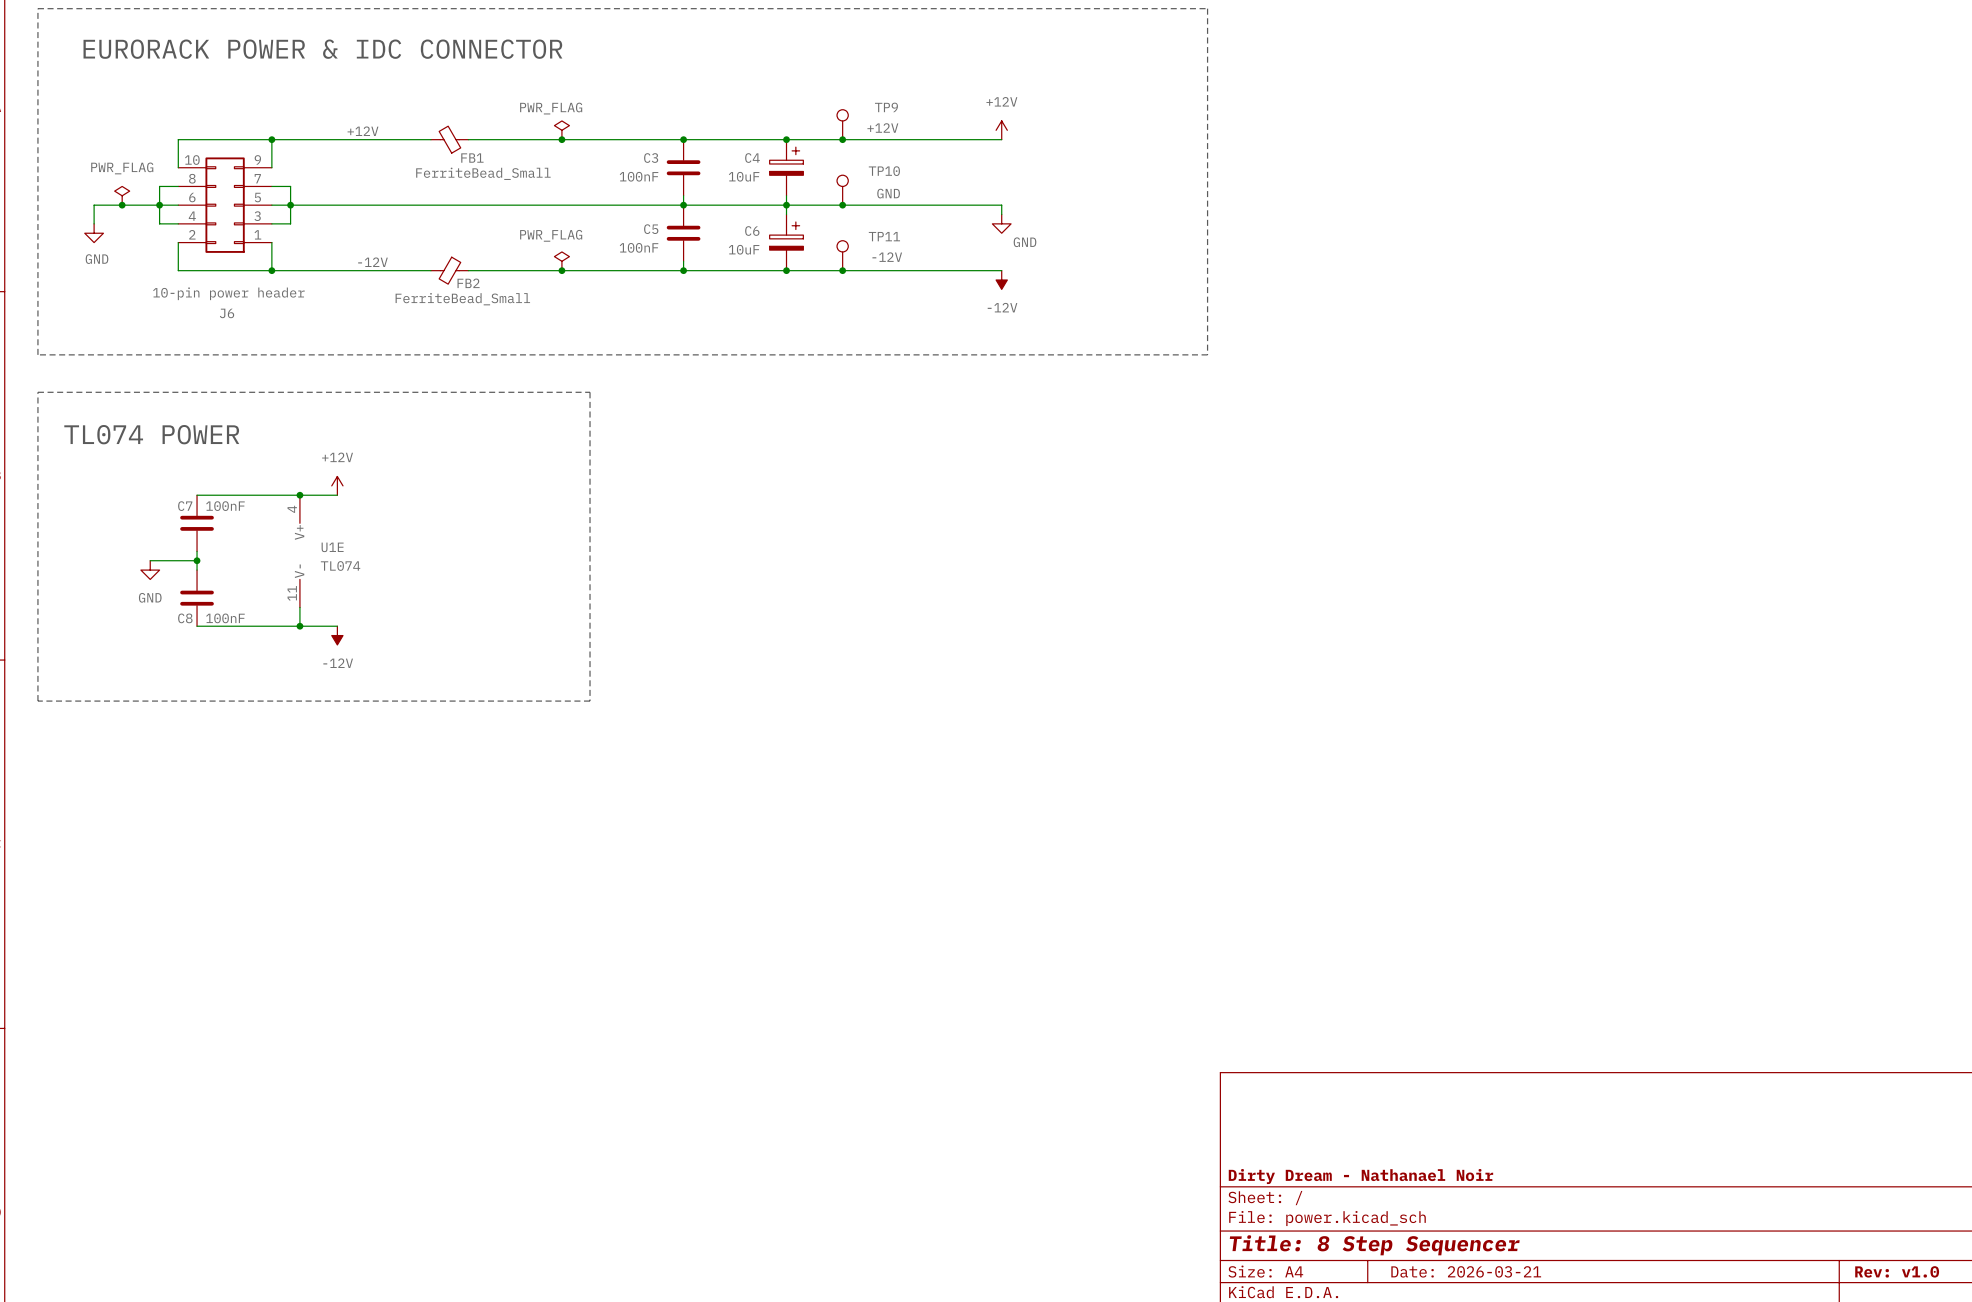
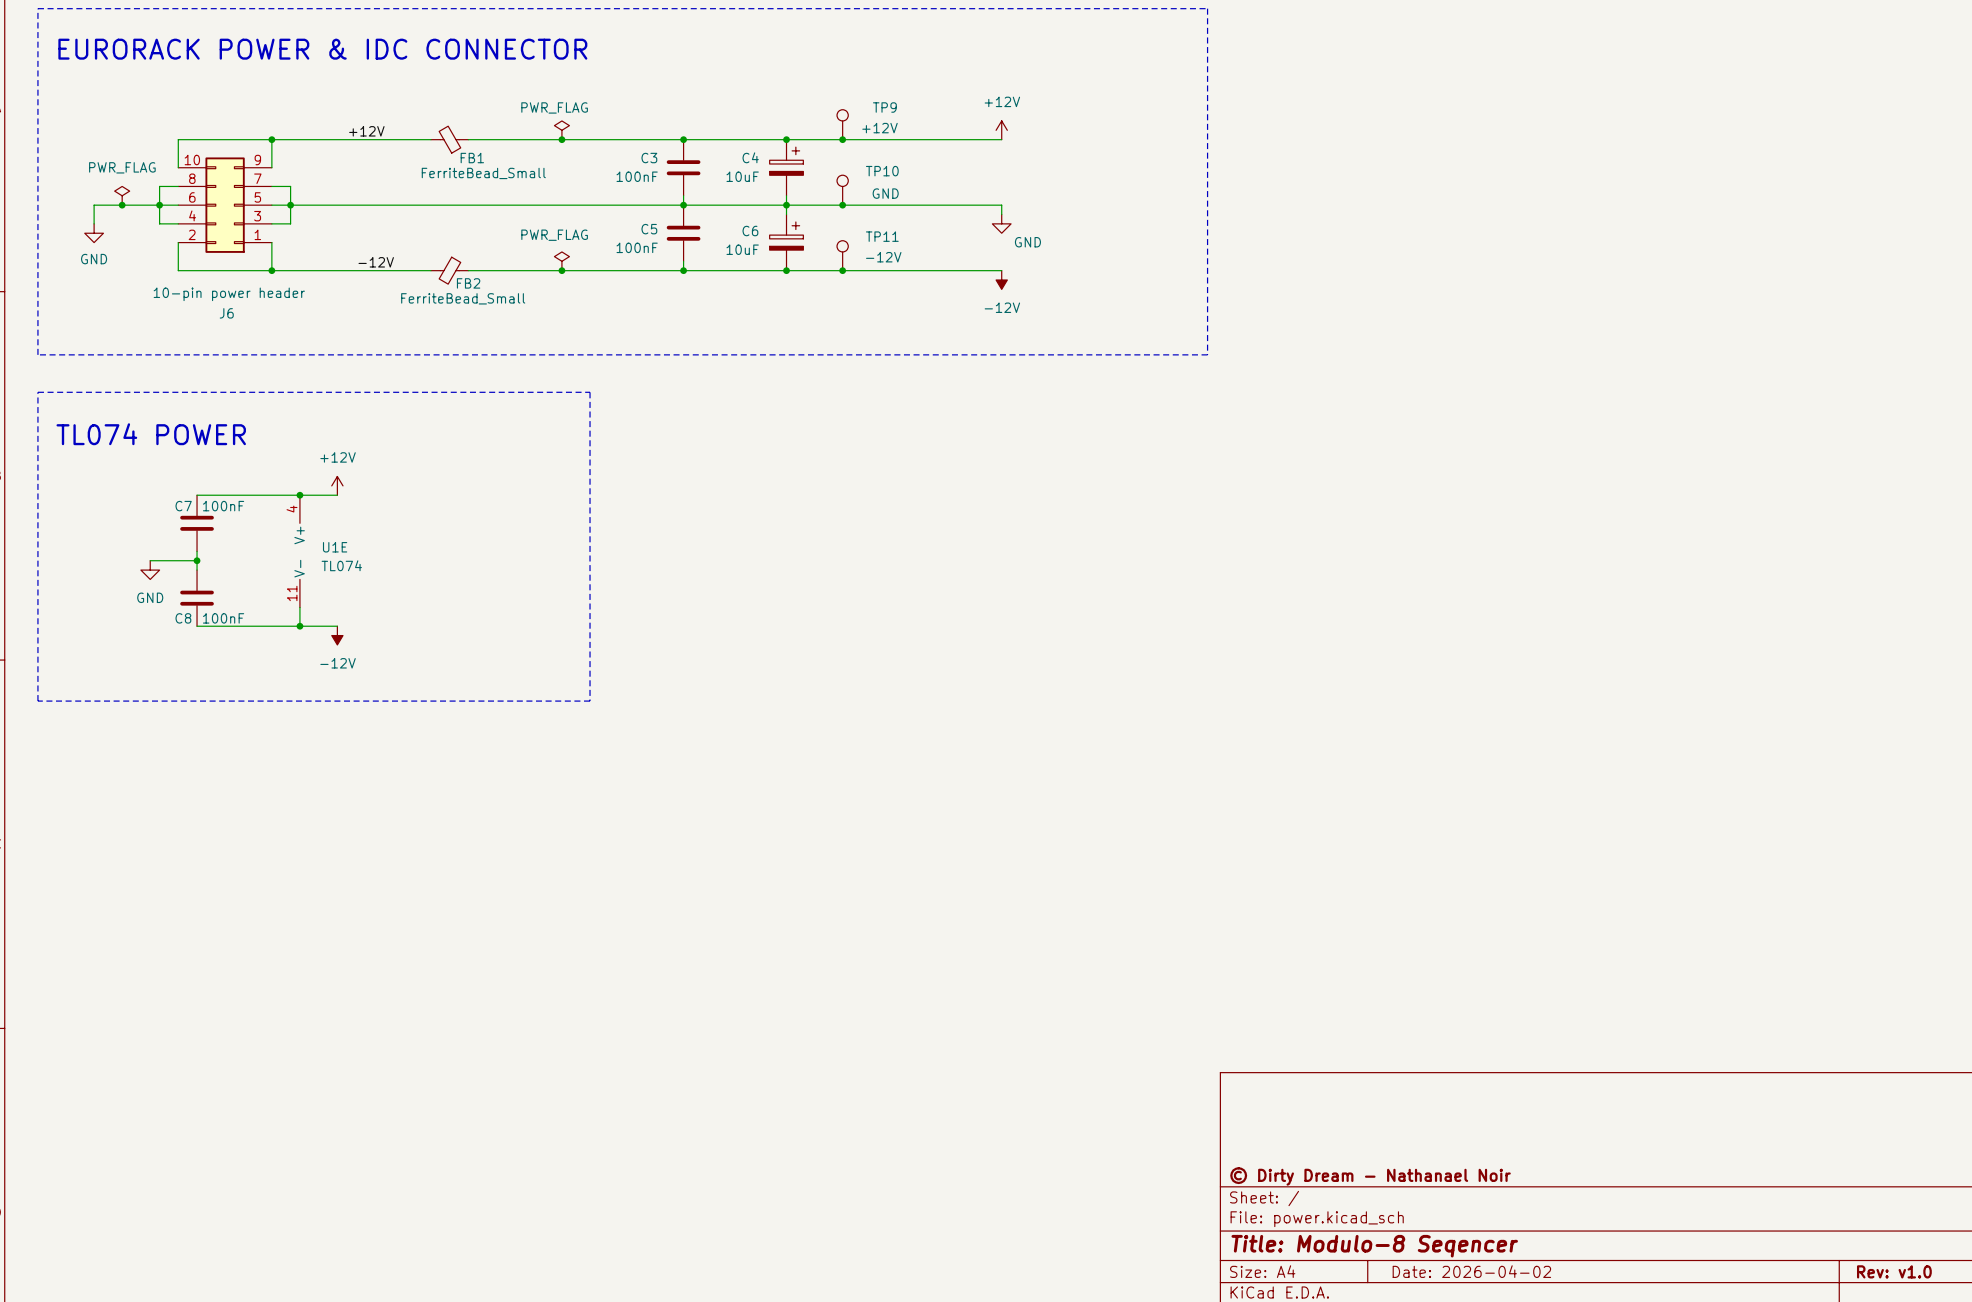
title block: Dirty Dream - Nathanael Noir (1360, 1176) -> © Dirty Dream - Nathanael Noir (1370, 1176)
title block: Title: 8 Step Sequencer (1374, 1245) -> Title: Modulo-8 Seqencer (1374, 1246)
title block: Date: 2026-03-21 (1466, 1271) -> Date: 2026-04-02 (1471, 1271)

